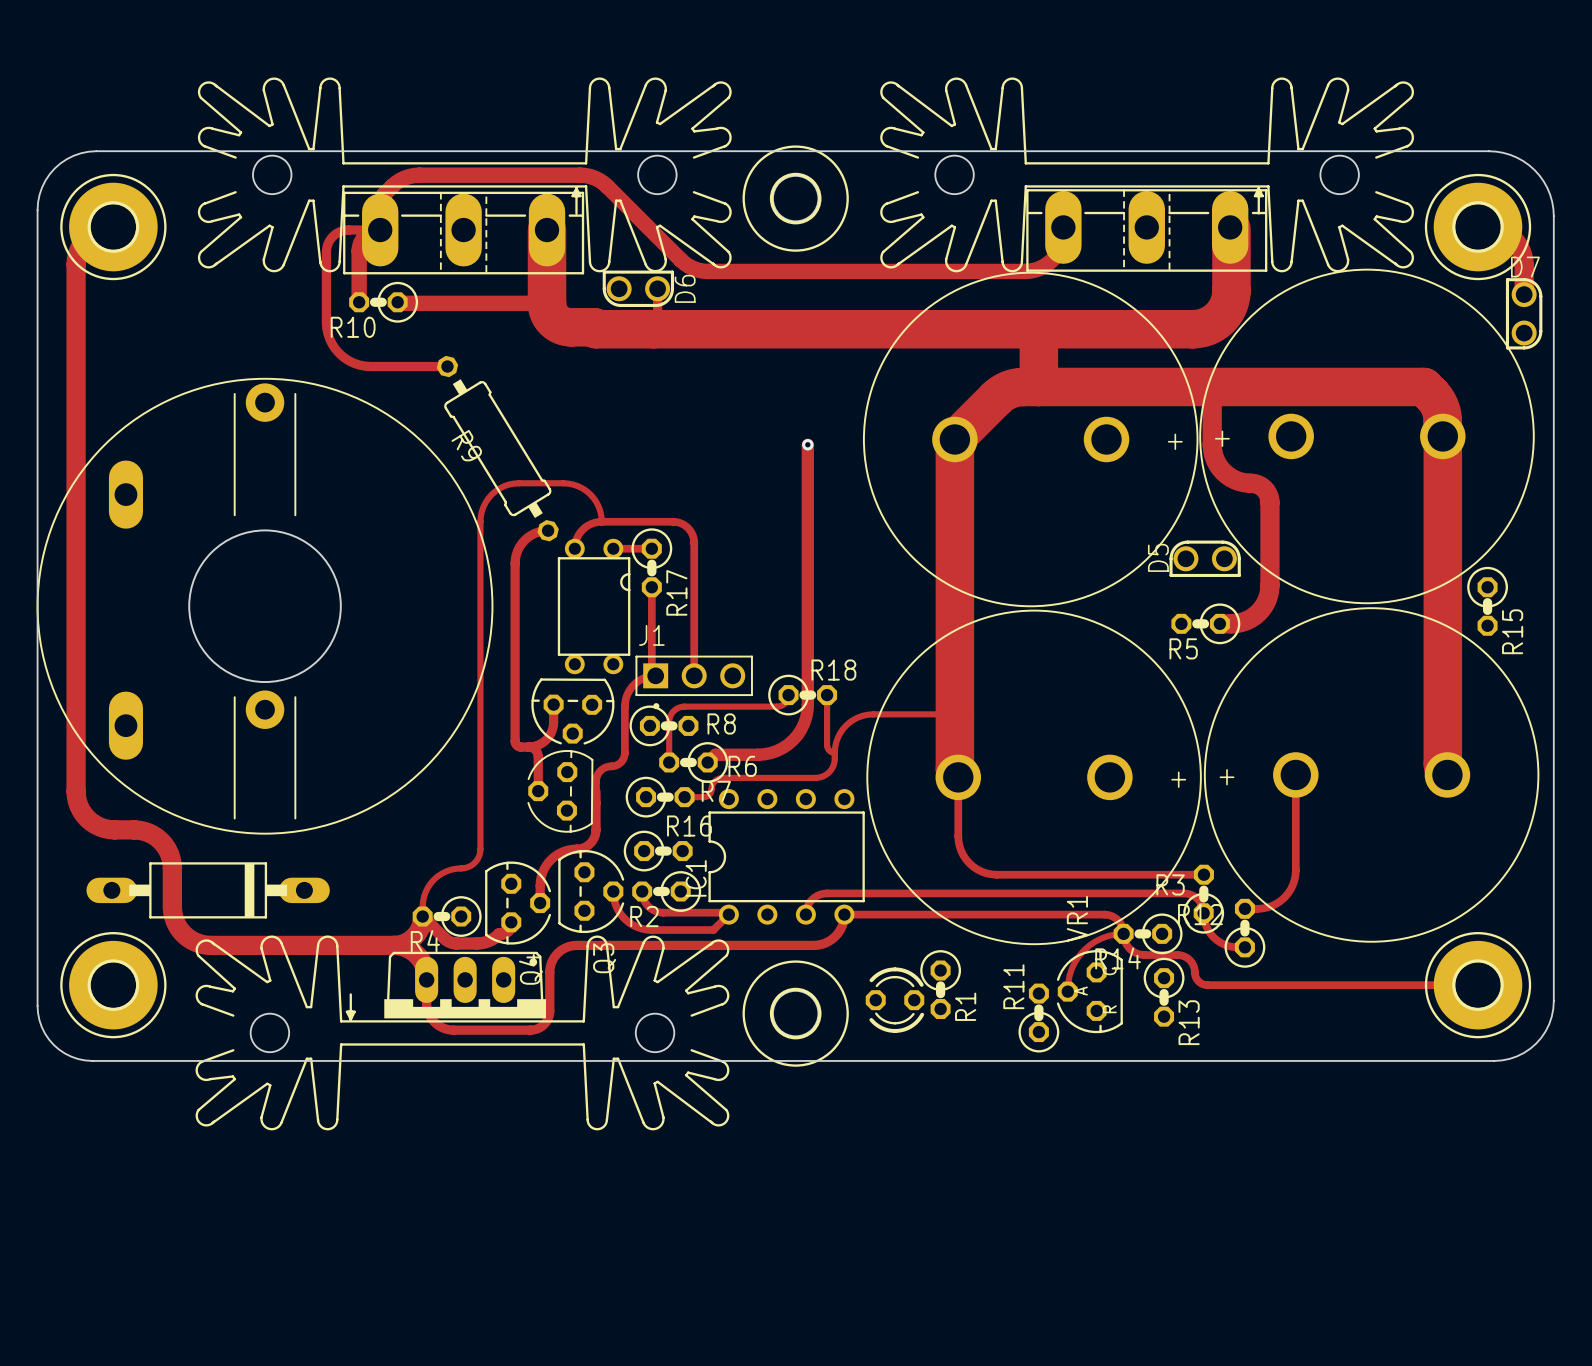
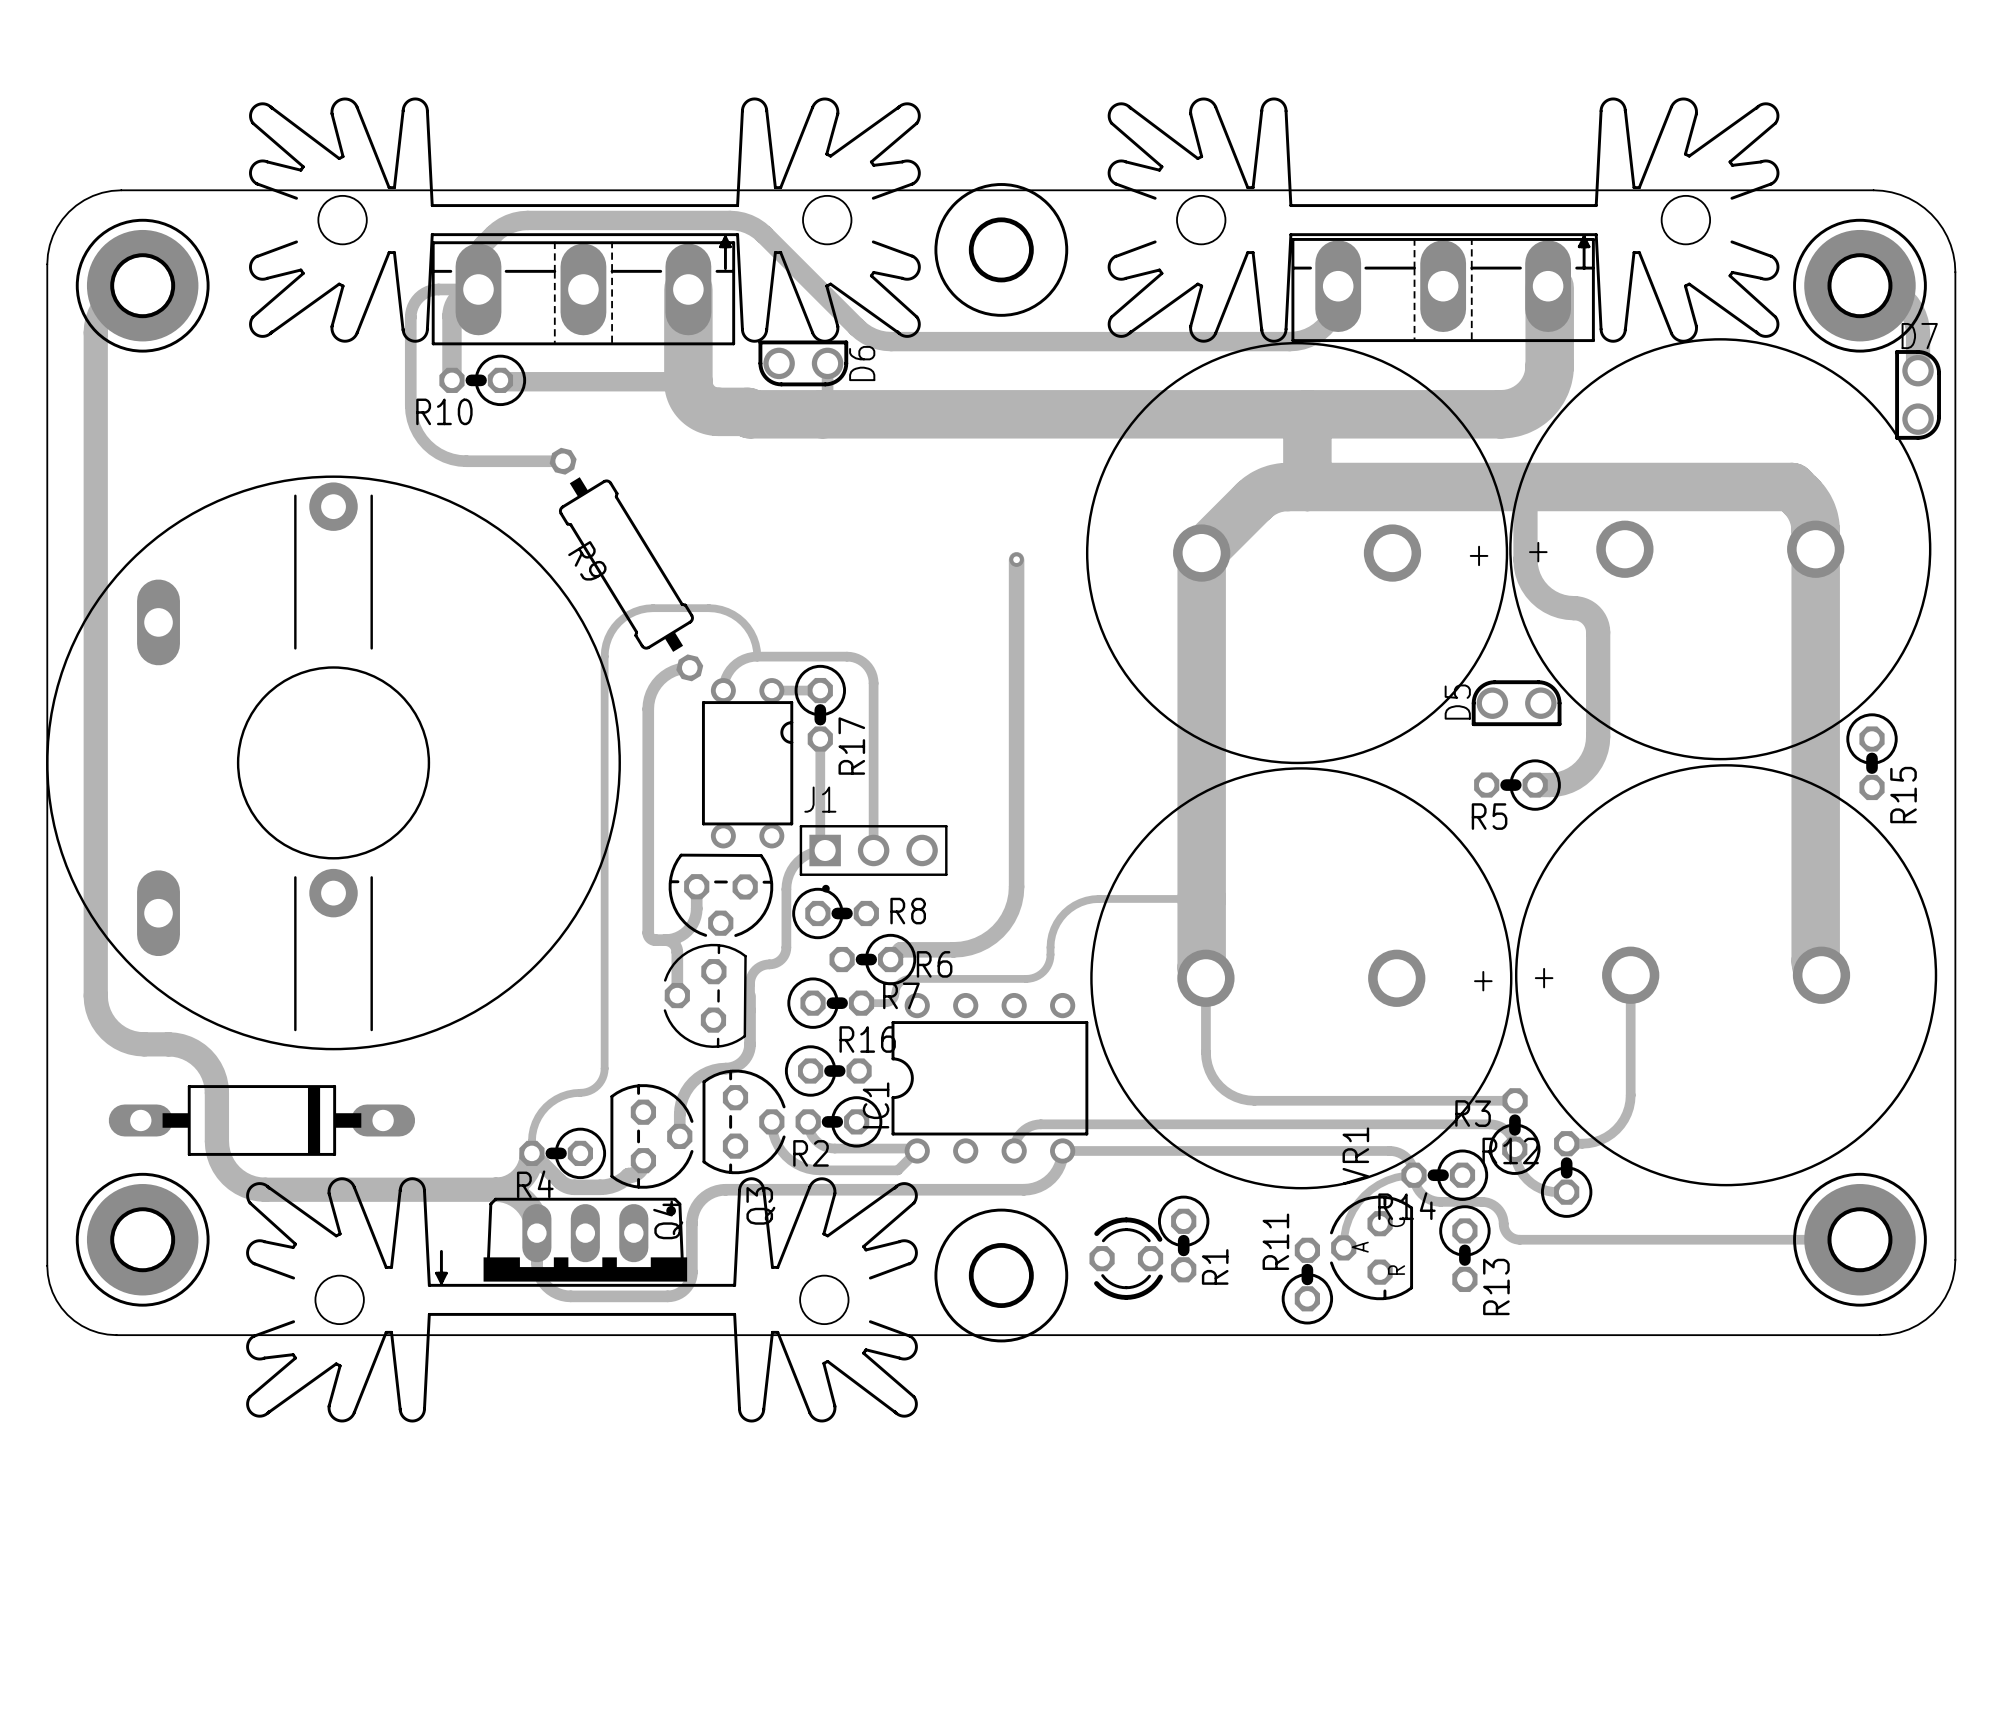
track: (788, 695) (786, 702) (778, 706) (684, 706) (676, 708) (672, 712) (669, 720) (669, 762) -> none
R18: (802, 695) -> none
track: (827, 695) (827, 746) (830, 751) (834, 752) -> none

